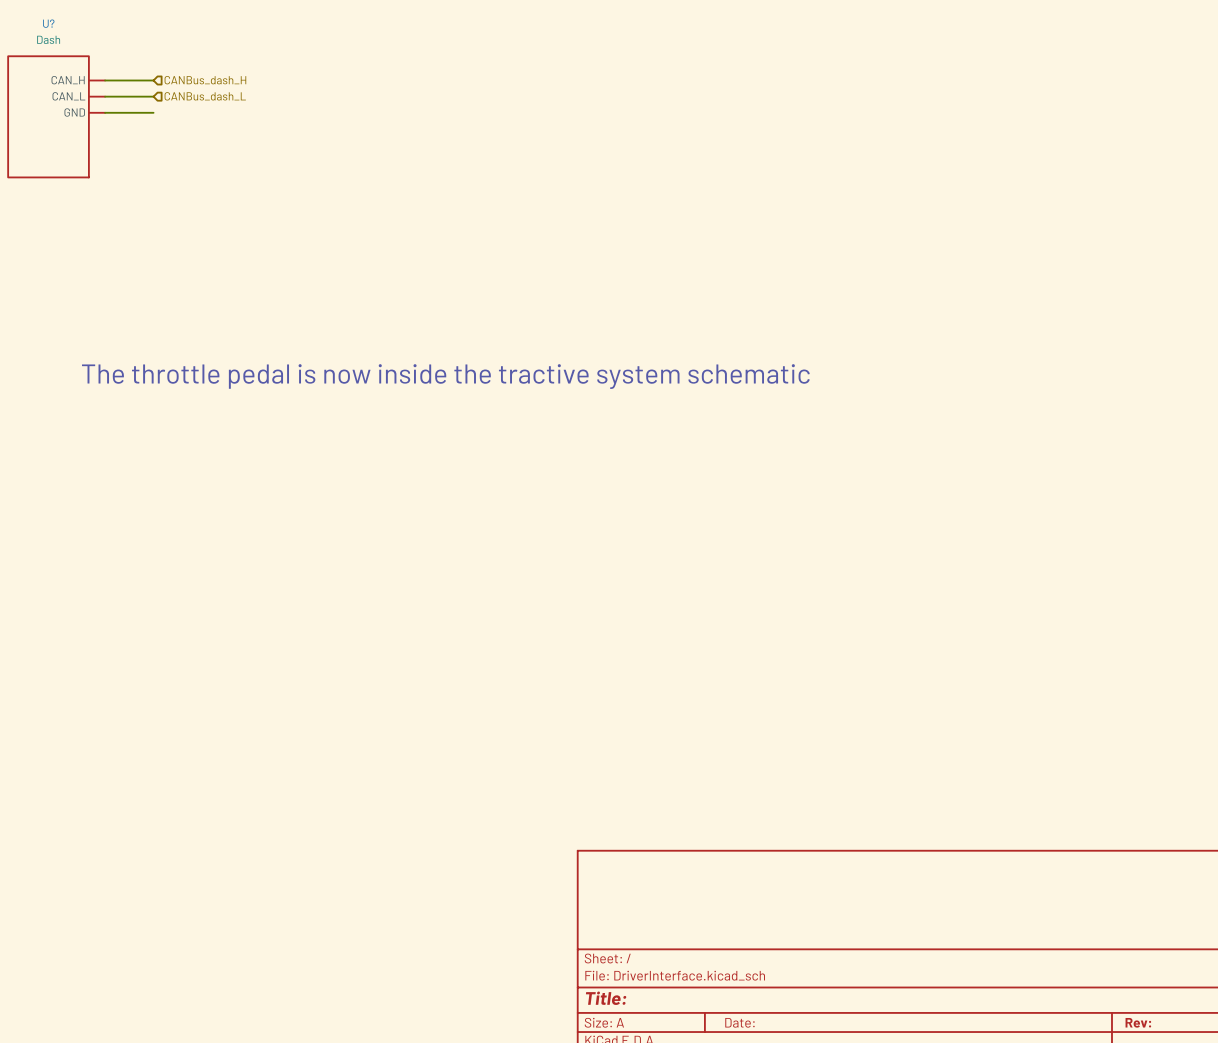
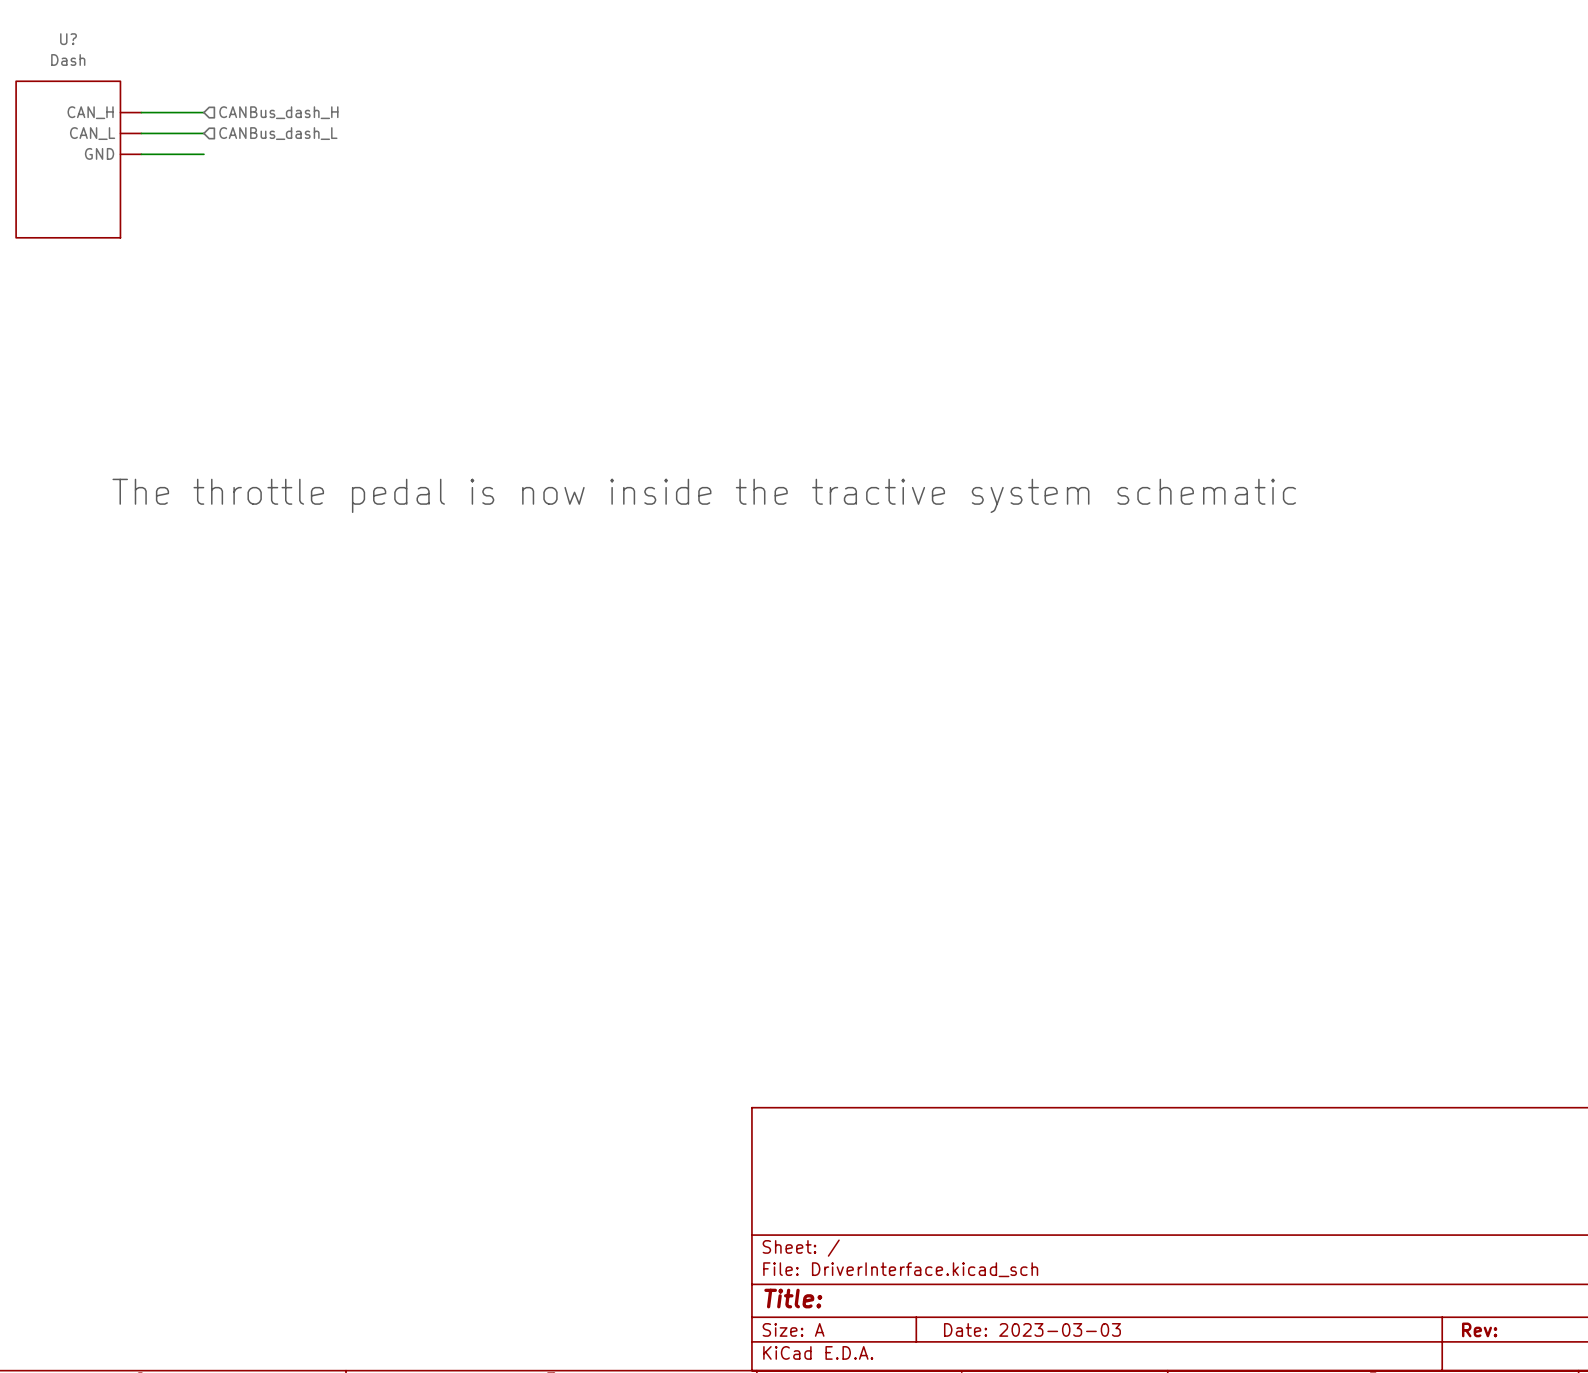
title block: Date: (739, 1022) -> Date: 2023-03-03 (1032, 1329)

